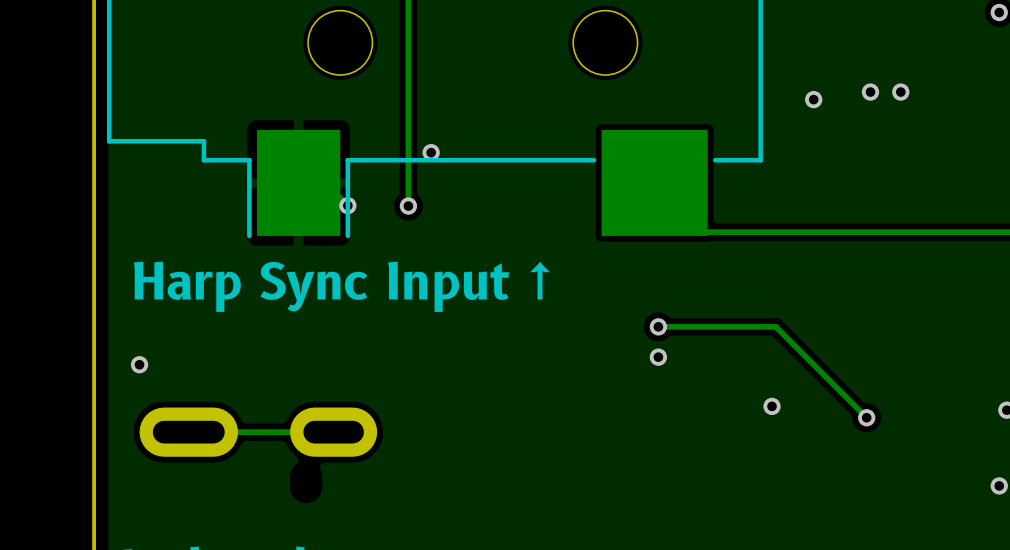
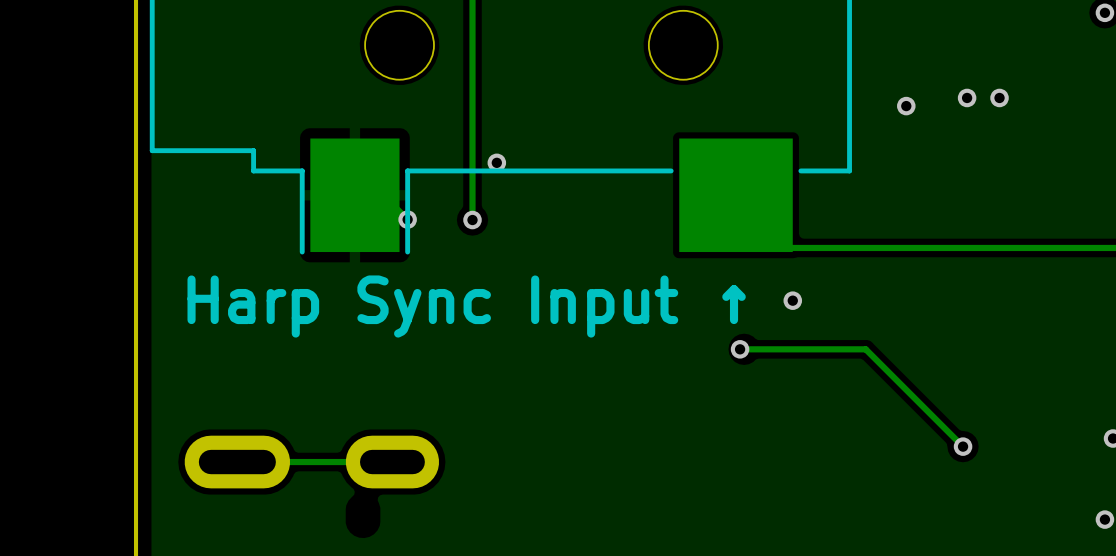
via: none -> (792, 300)
via: (658, 357) -> none
via: (139, 364) -> none
via: (772, 406) -> none

